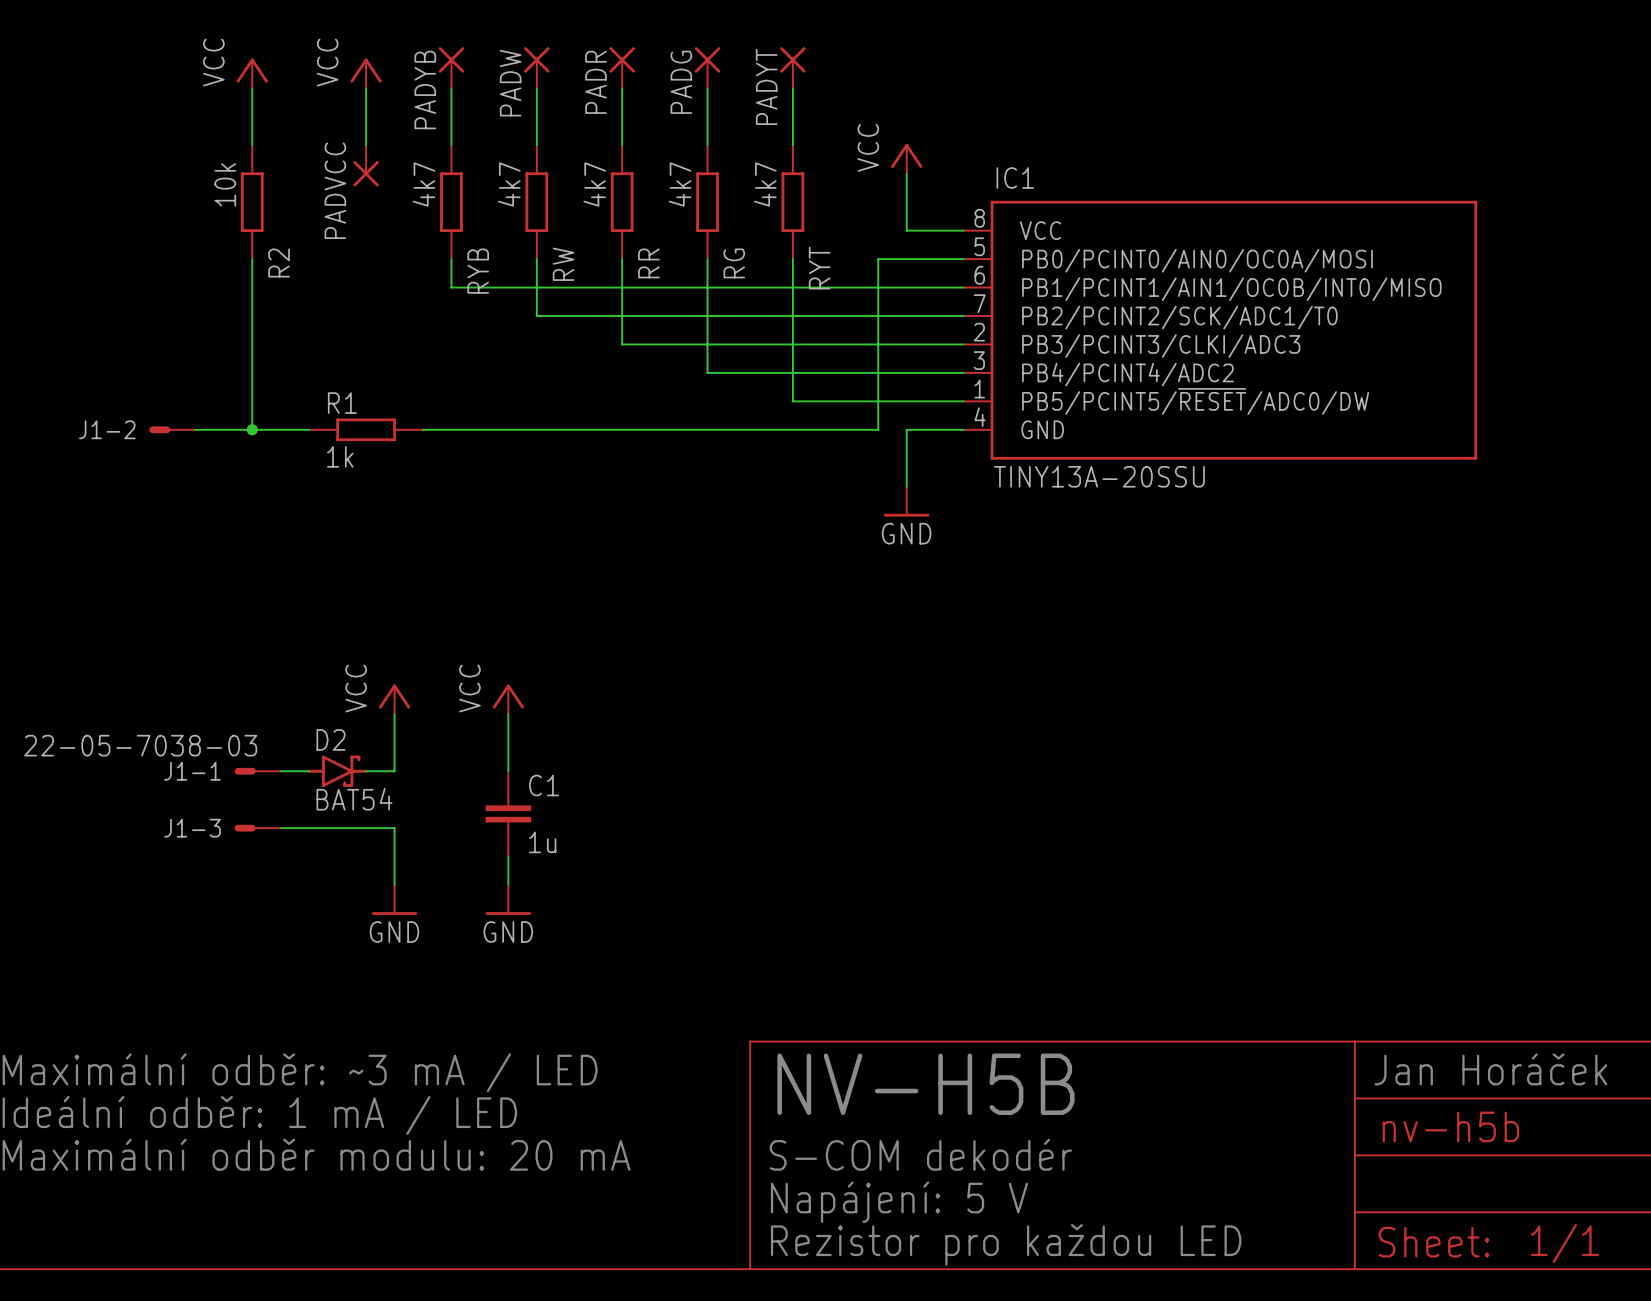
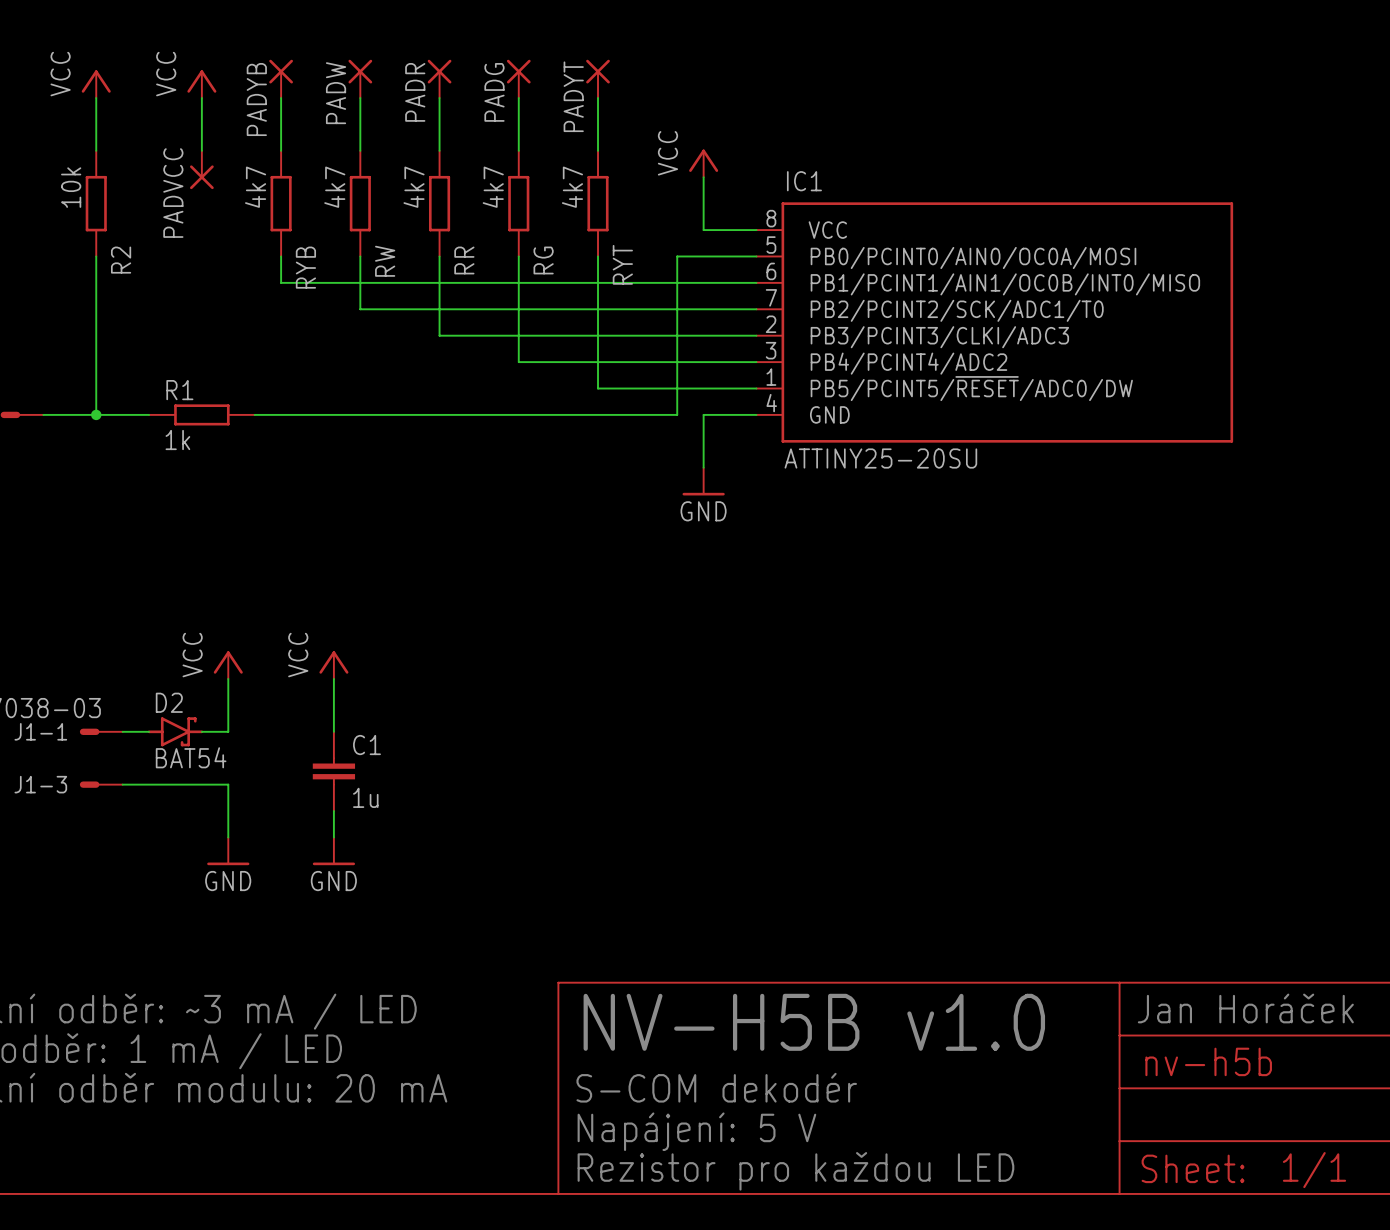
IC1 value: TINY13A-20SSU (1099, 476) -> ATTINY25-20SU (880, 458)
text: NV-H5B (925, 1084) -> NV-H5B v1.0 (814, 1022)

